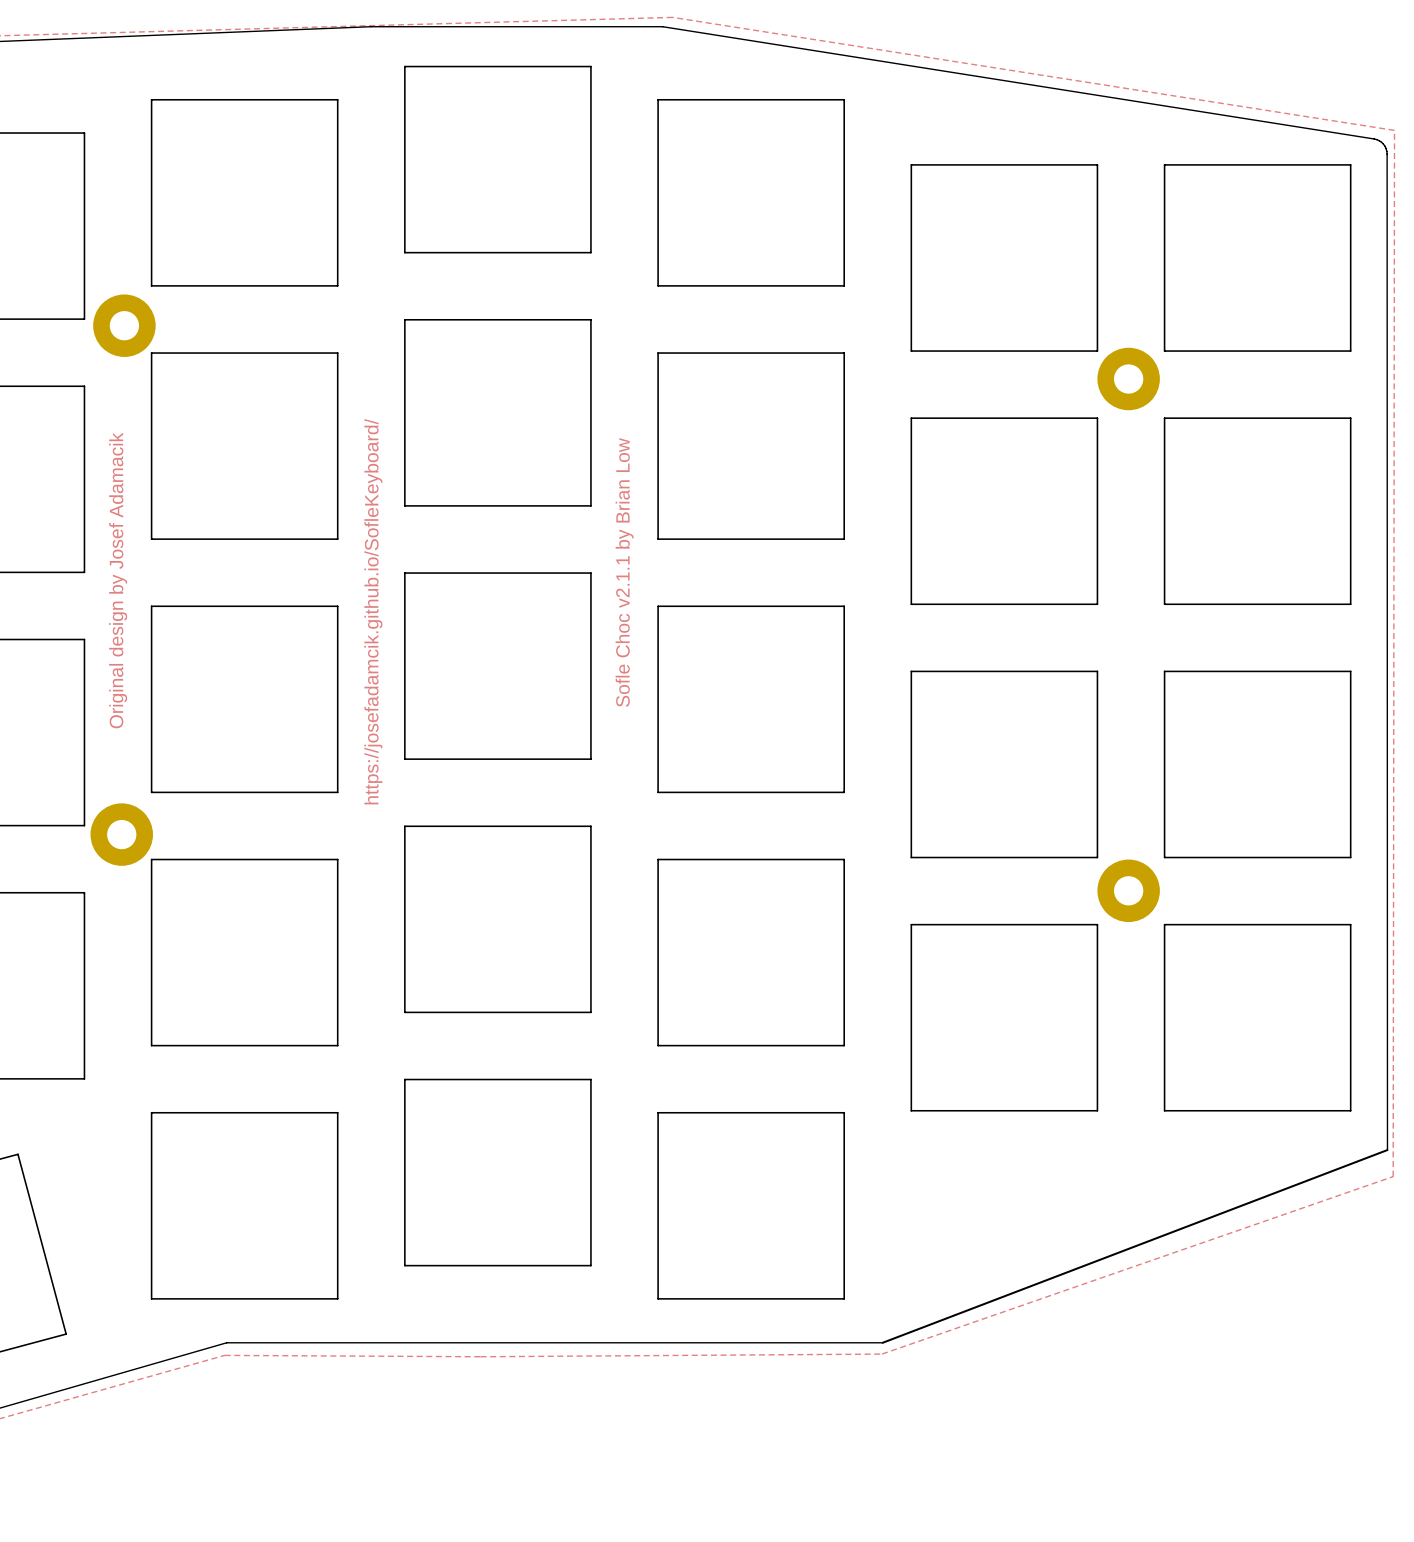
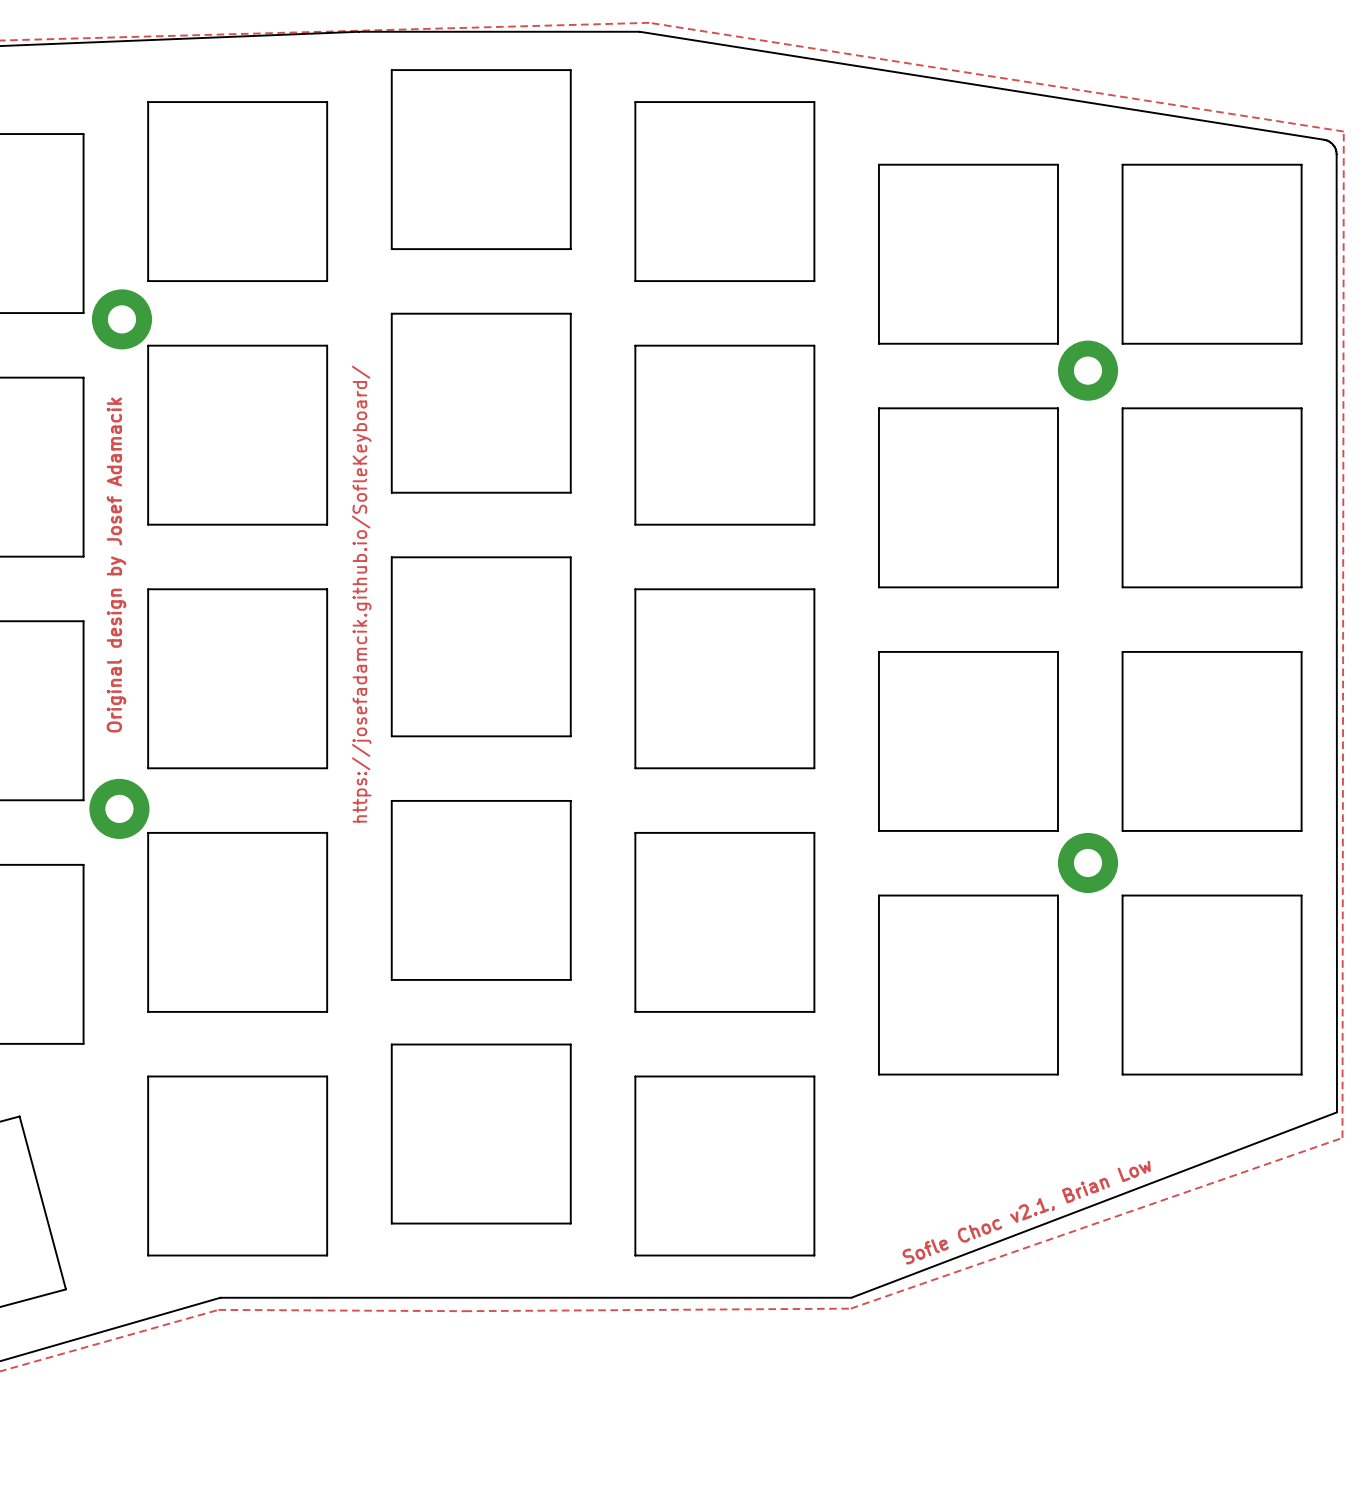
text: Sofle Choc v2.1.1 by Brian Low (624, 572) -> none
text: none -> Sofle Choc v2.1, Brian Low (1026, 1212)

